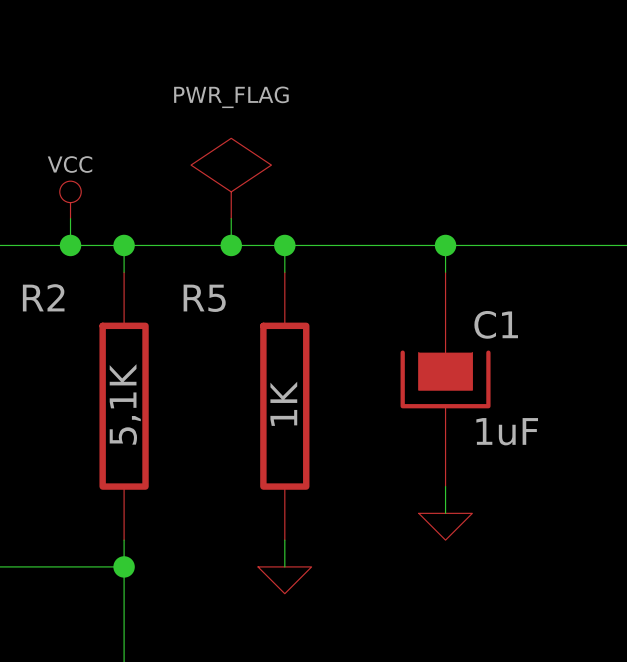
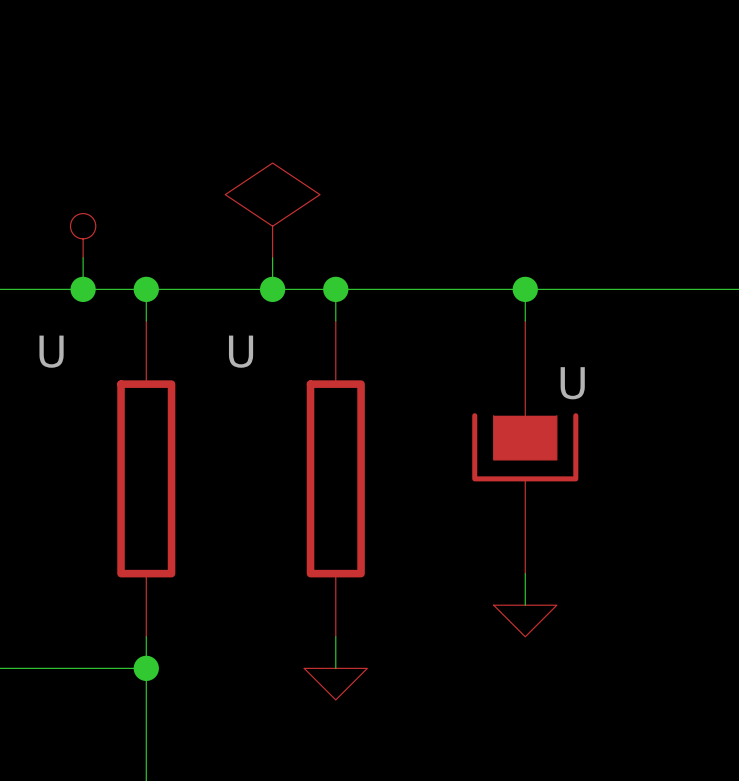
power symbol text: PWR_FLAG (231, 97) -> none
power symbol text: VCC (70, 164) -> none
R2 name: R2 (43, 297) -> U (51, 351)
R5 name: R5 (204, 298) -> U (241, 351)
C1 name: C1 (496, 324) -> U (572, 383)
R5 value: 1K (283, 403) -> none
R2 value: 5,1K (125, 404) -> none
C1 value: 1uF (507, 431) -> none

